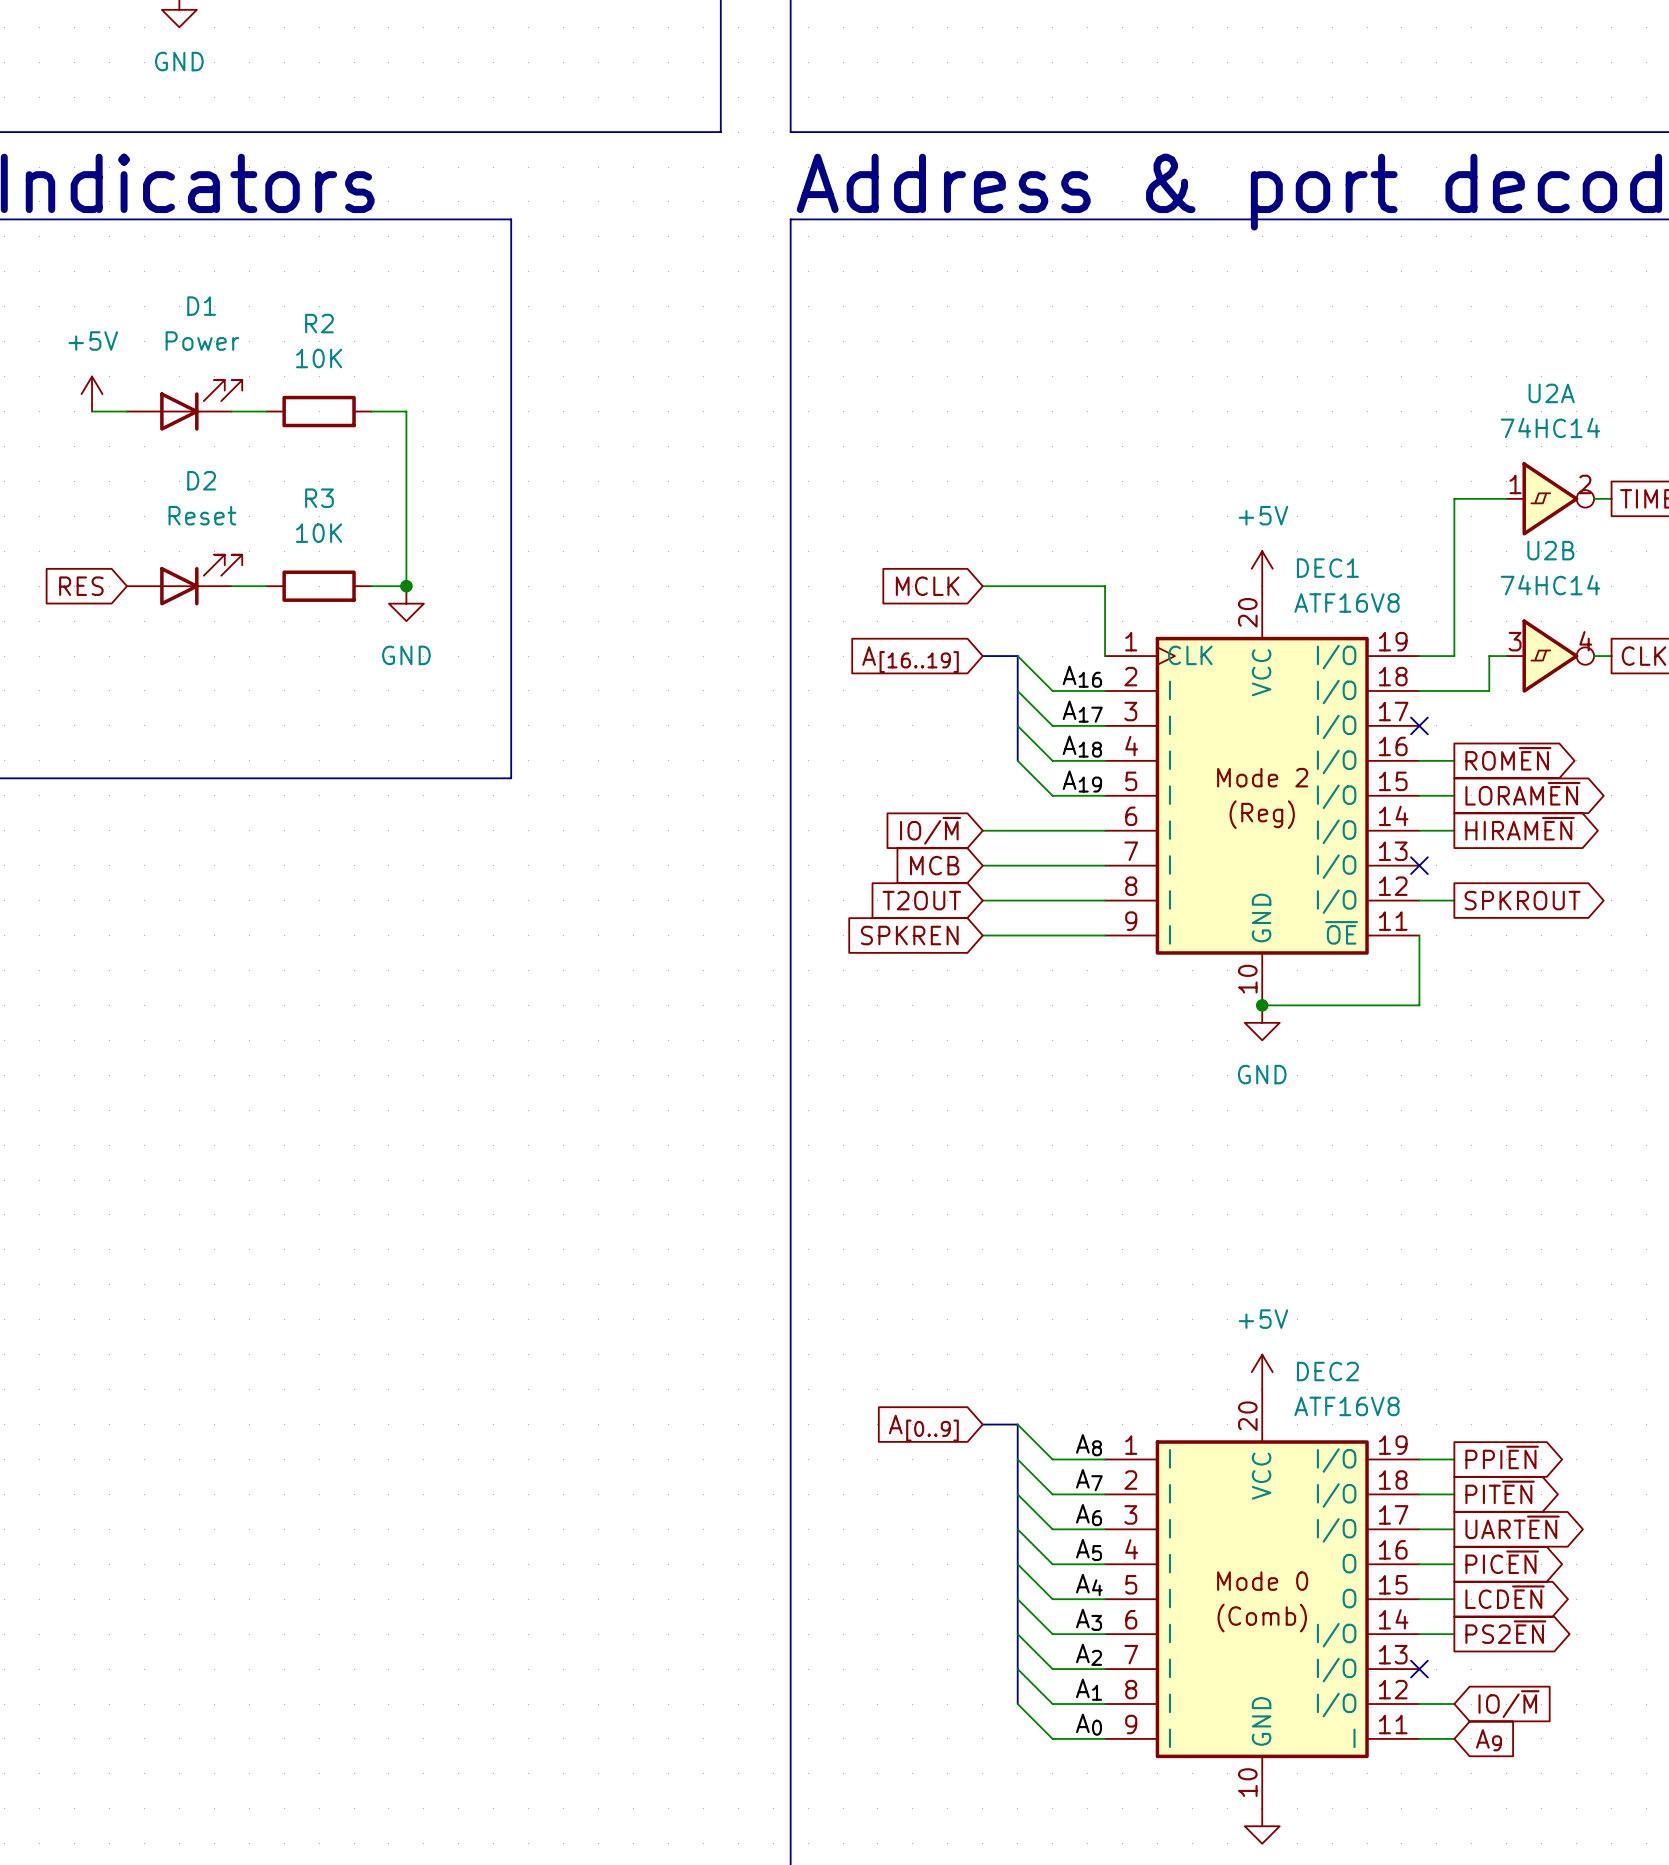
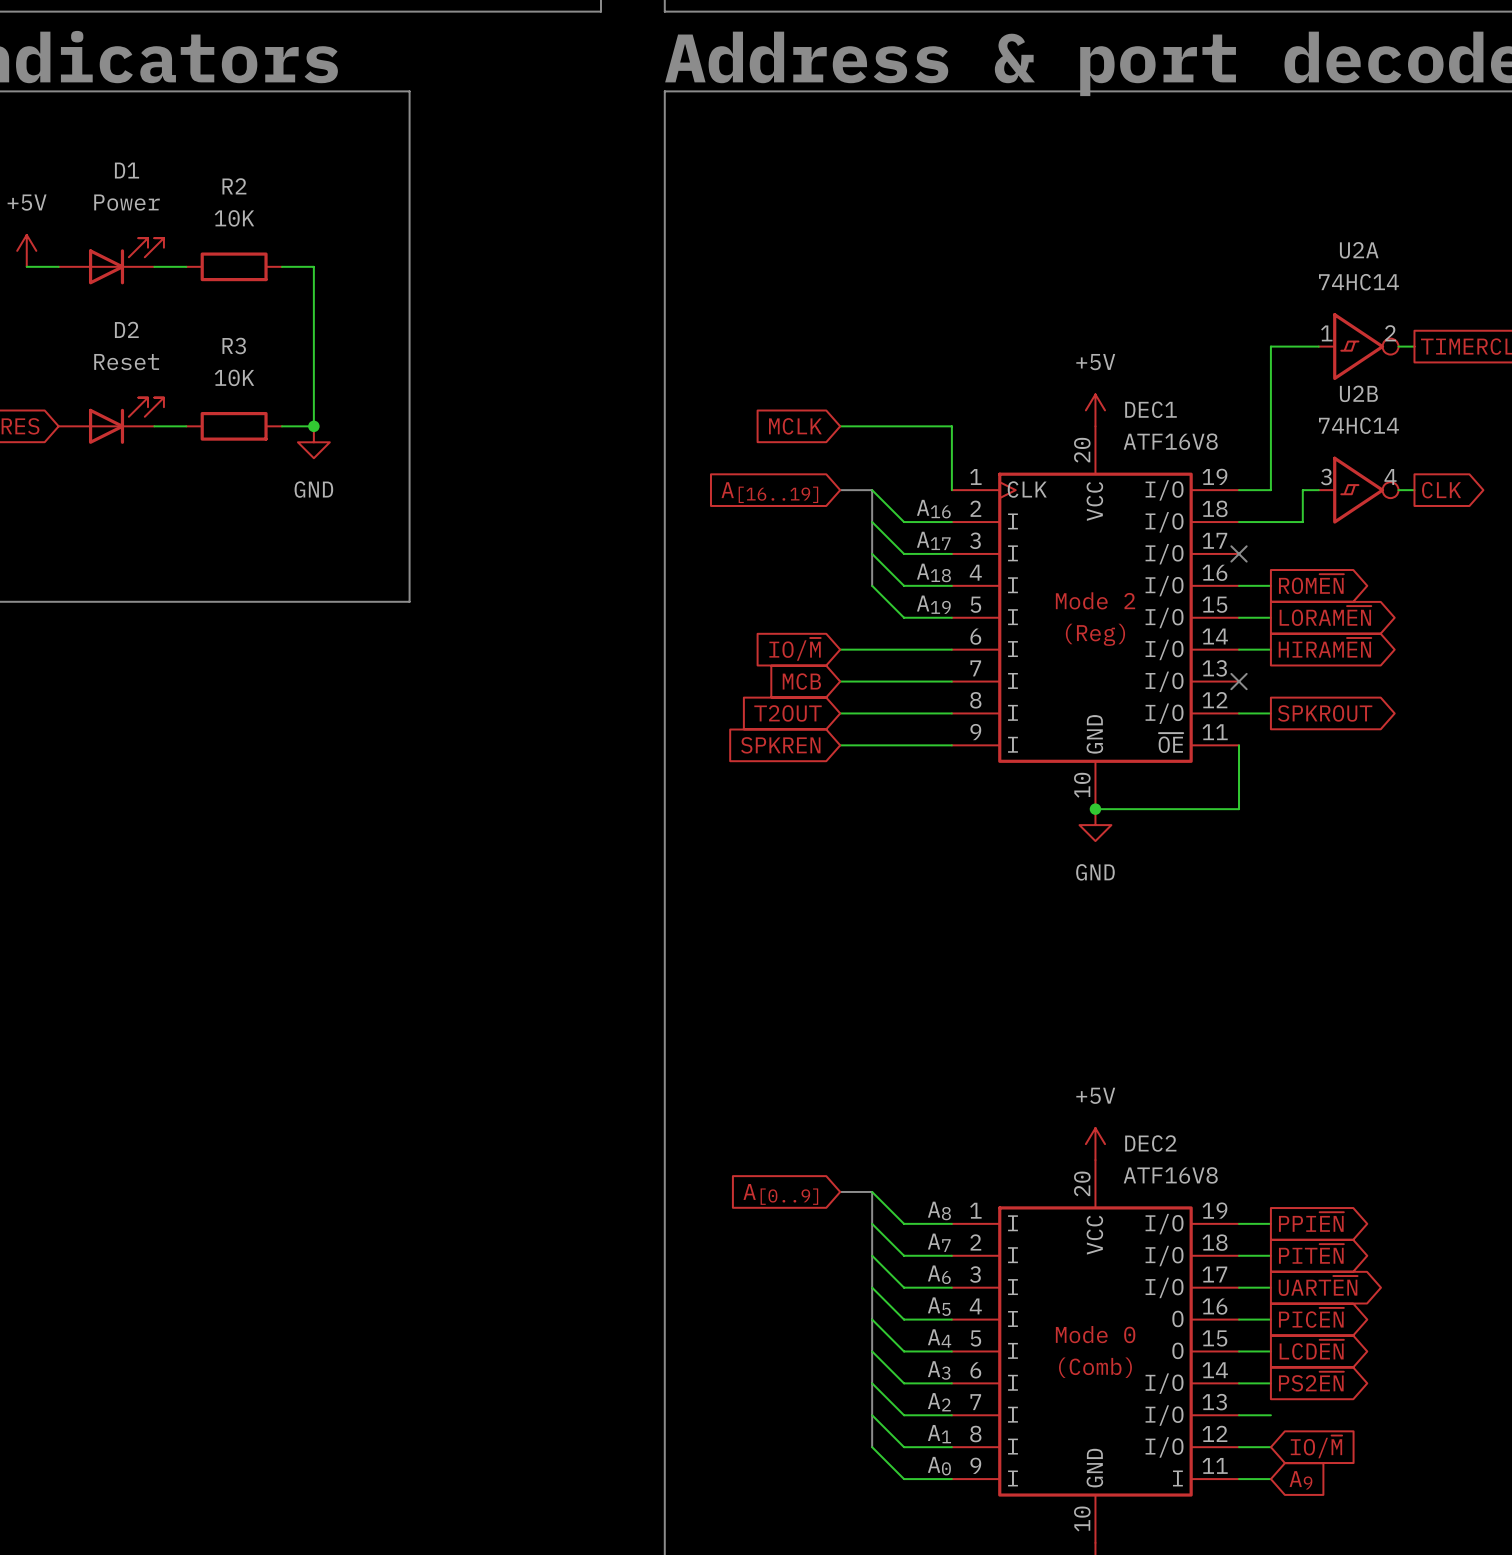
wire: none -> (1239, 1415) (1270, 1415)
no-connect mark: (1419, 1669) -> none

